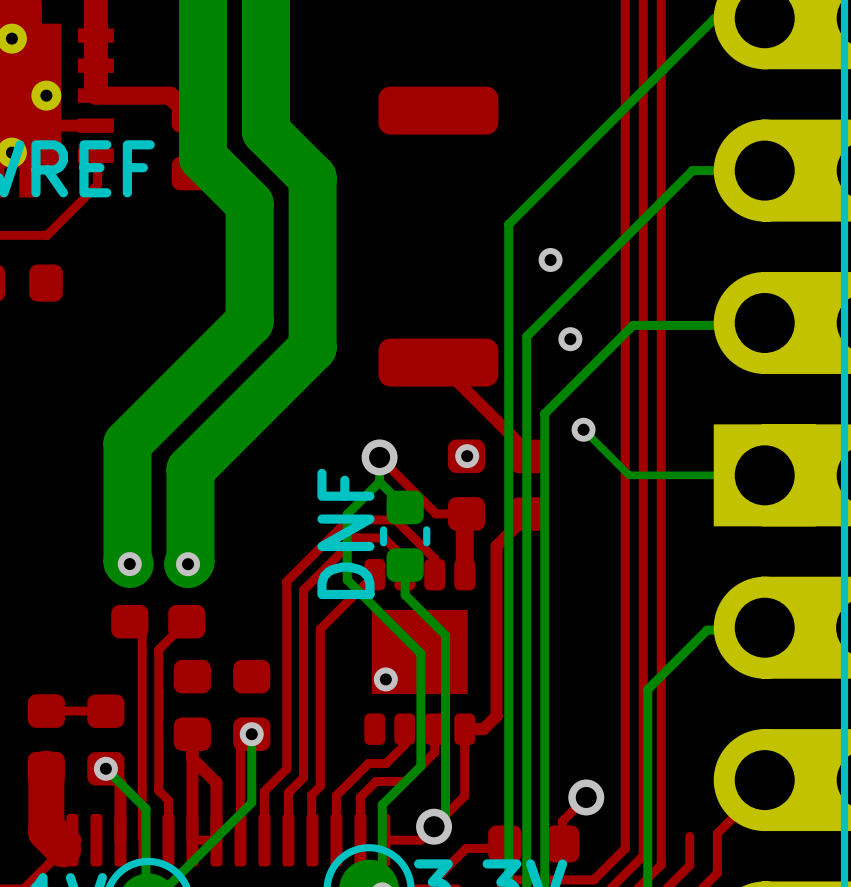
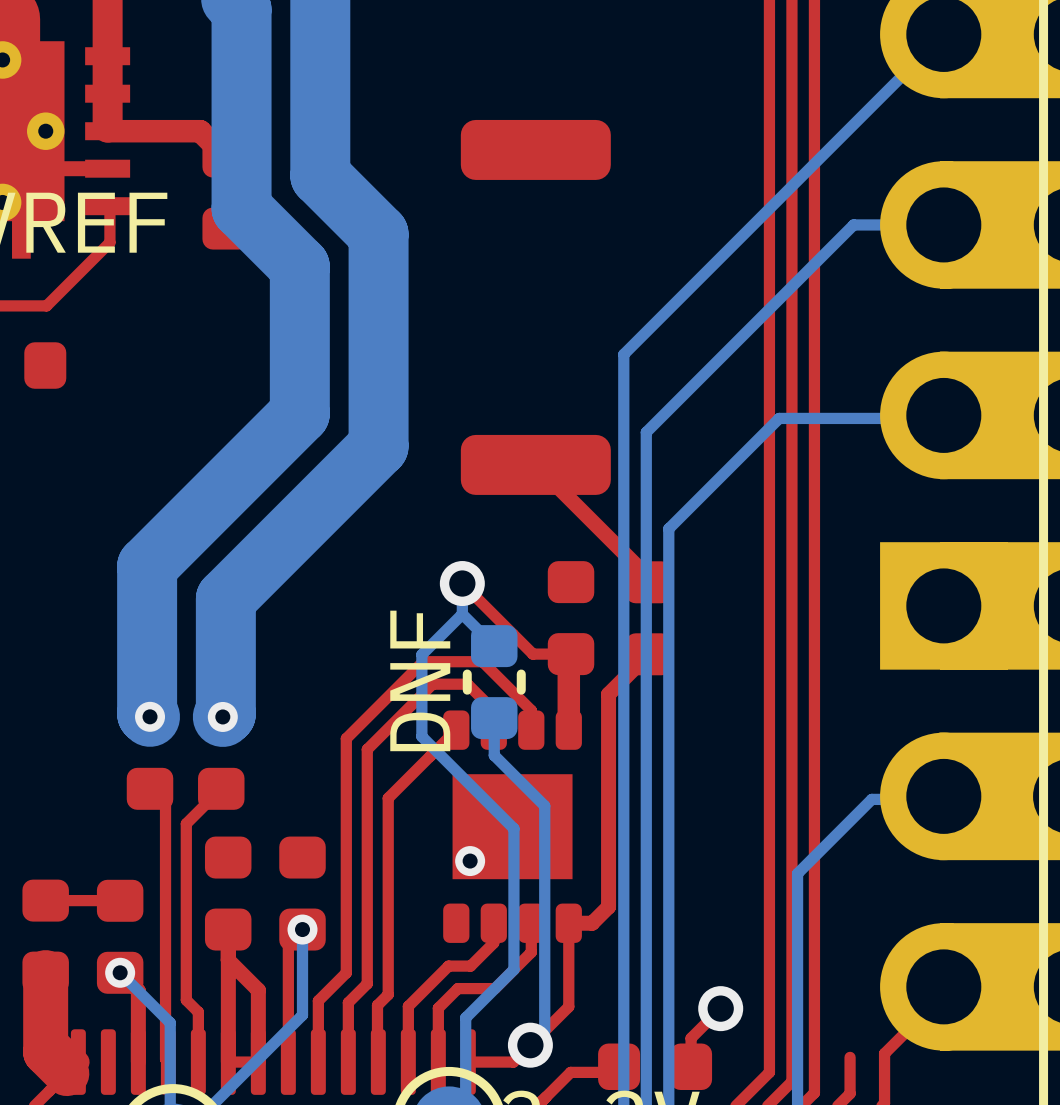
bottom track: (764, 18) (714, 18) (508, 224) (508, 274) -> (943, 34) (623, 354)
via: (550, 259) -> none
via: (570, 339) -> none
bottom track: (583, 429) (629, 475) (764, 475) -> none
via: (583, 429) -> none
via: (467, 456) -> none

